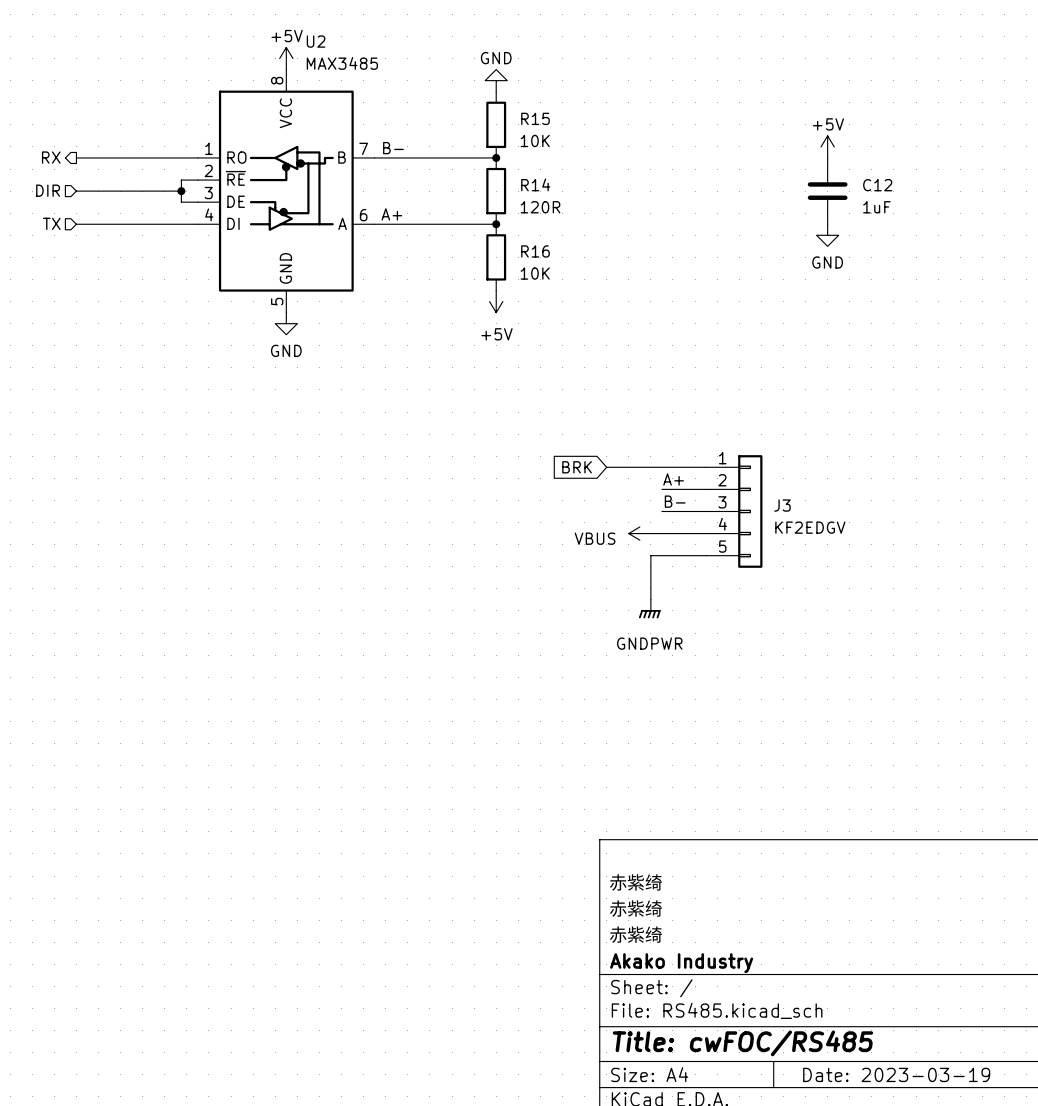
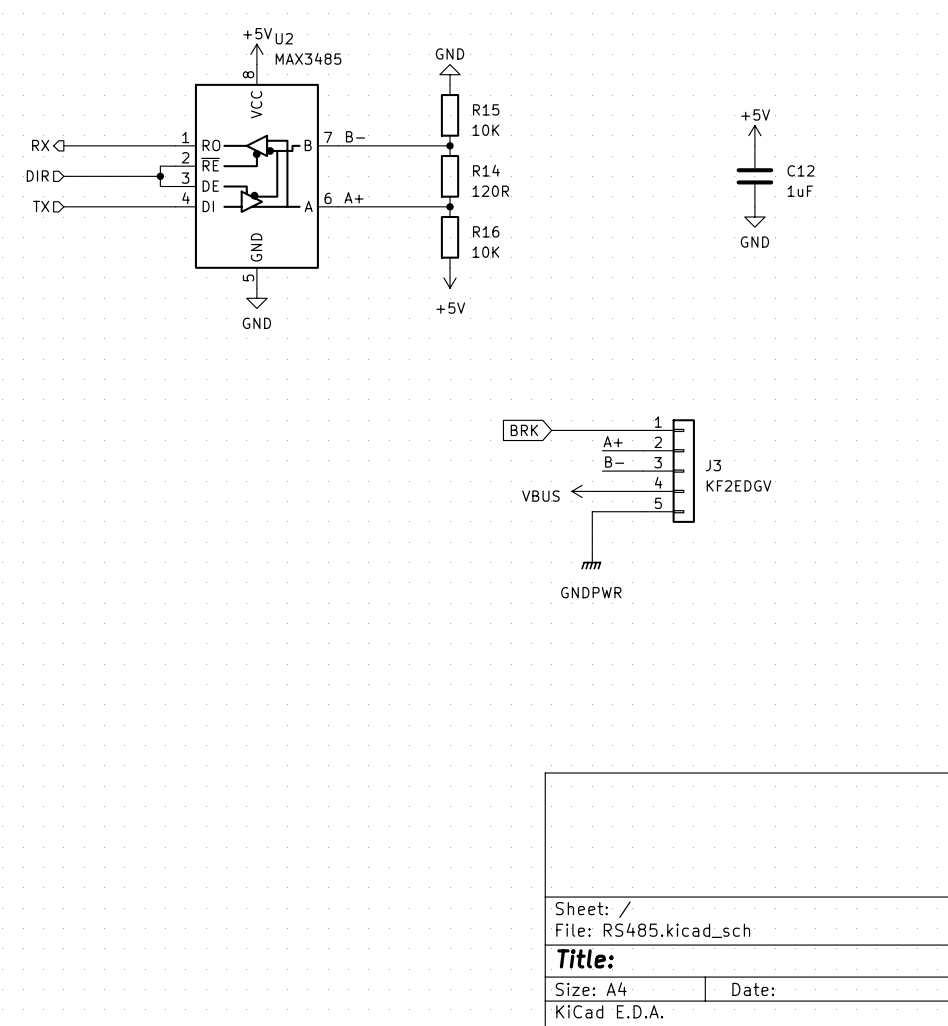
title block: 赤紫绮 (635, 882) -> none
title block: 赤紫绮 (635, 908) -> none
title block: 赤紫绮 (635, 934) -> none
title block: Akako Industry (681, 963) -> none
title block: Title: cwFOC/RS485 (742, 1043) -> Title: (585, 958)
title block: Date: 2023-03-19 (896, 1074) -> Date: (753, 989)

